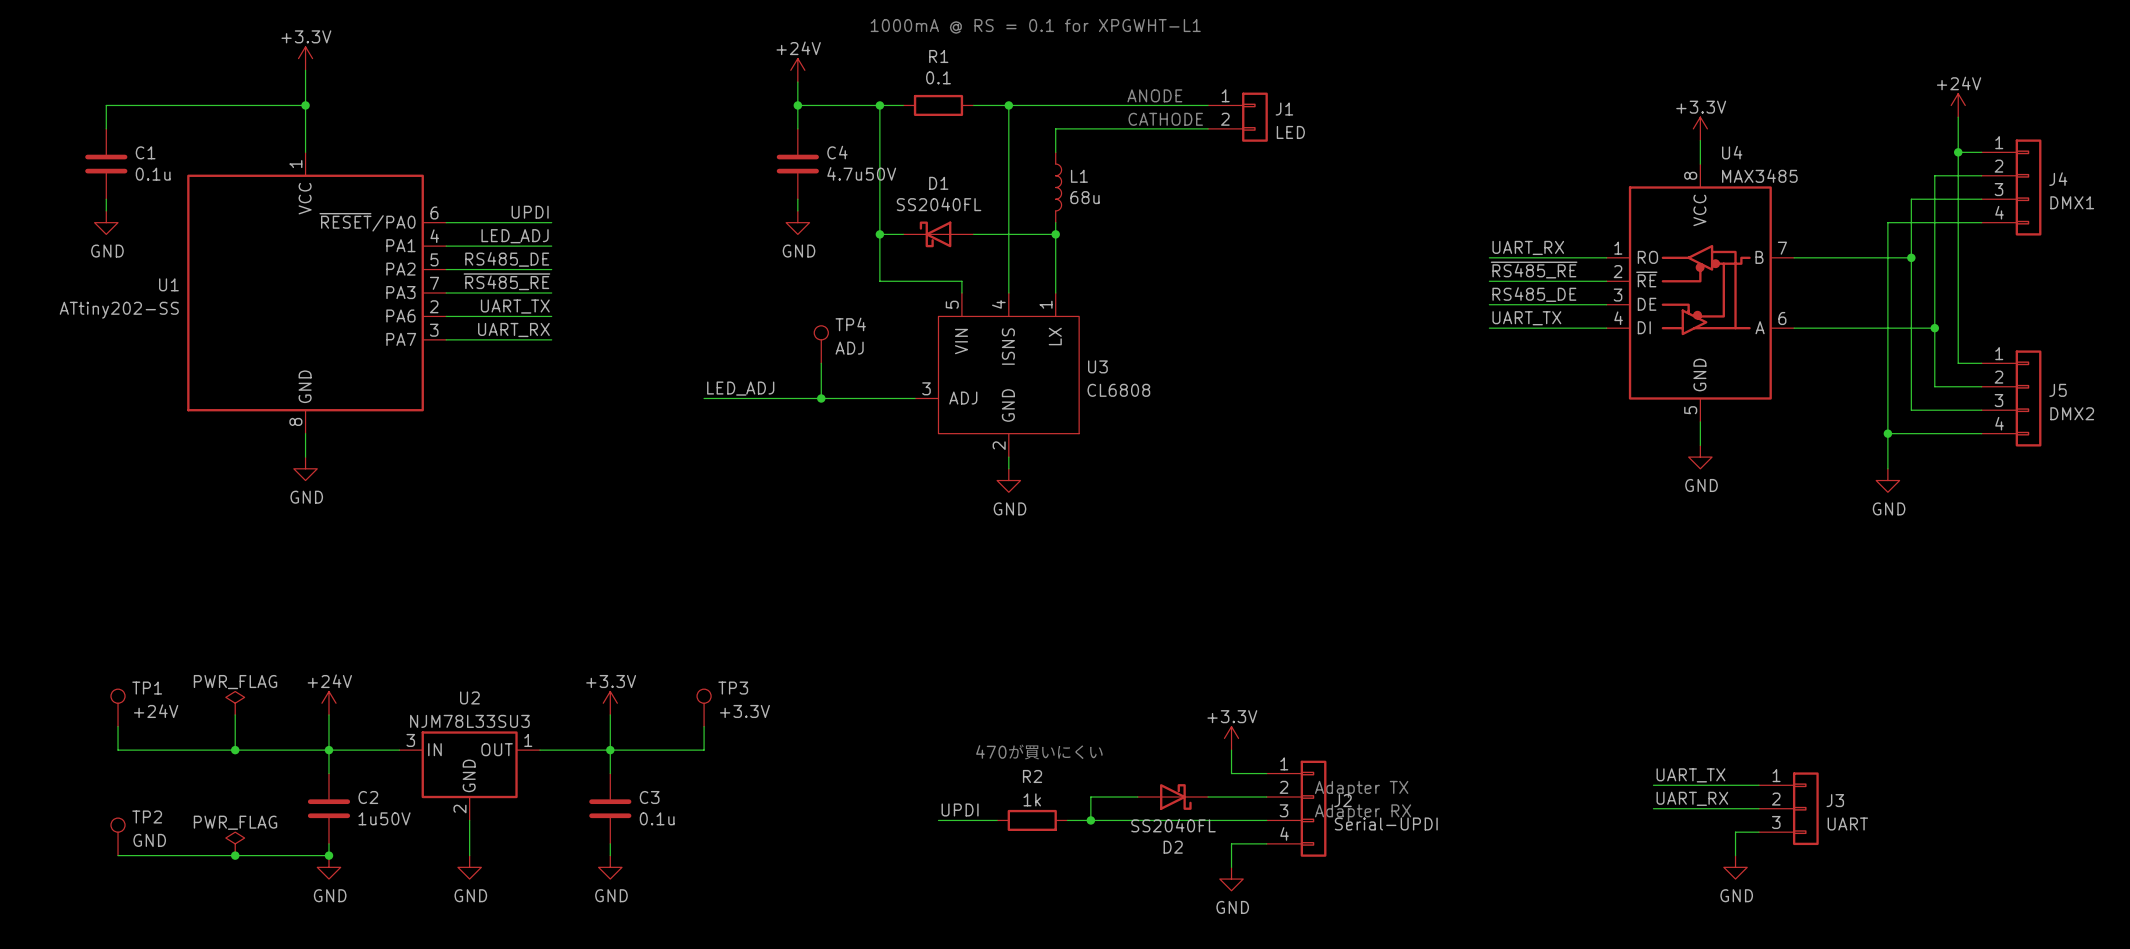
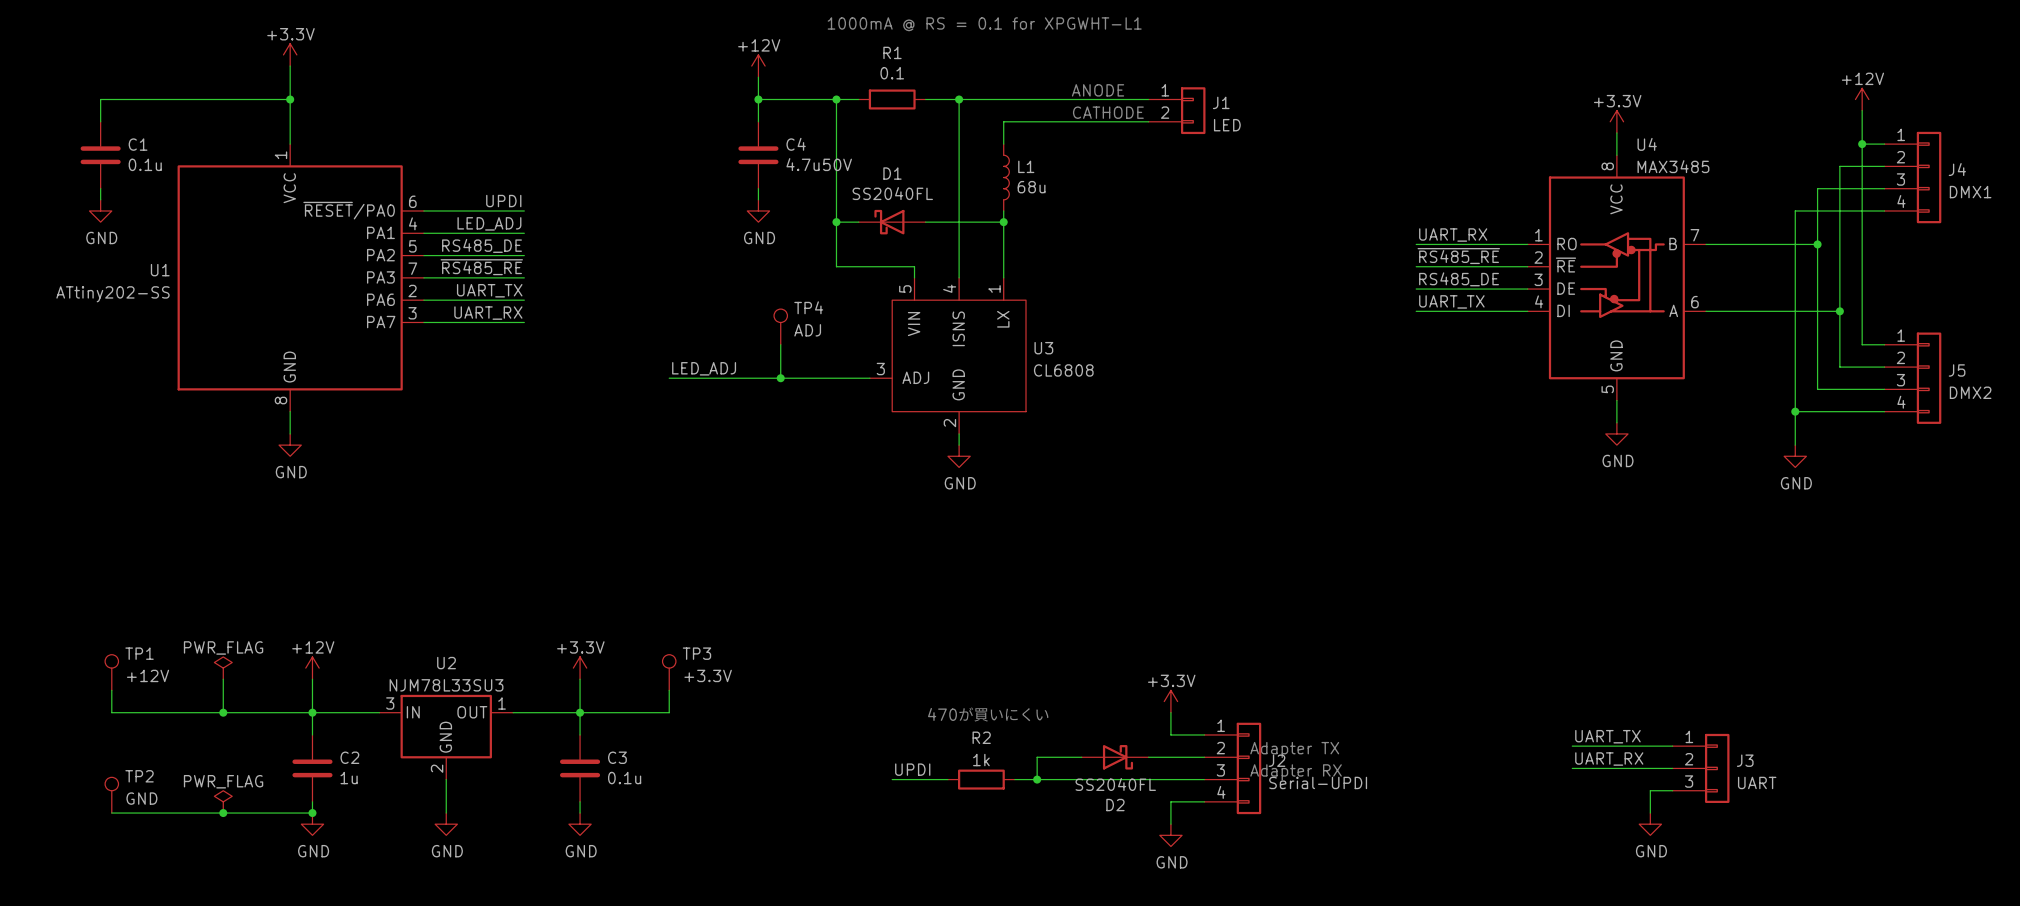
power symbol: +24V (797, 70) -> +12V (758, 66)
power symbol: +24V (1958, 105) -> +12V (1862, 99)
power symbol: +24V (328, 703) -> +12V (312, 668)
TP1 value: +24V (156, 711) -> +12V (148, 675)
C2 value: 1u50V (384, 818) -> 1u (349, 778)

